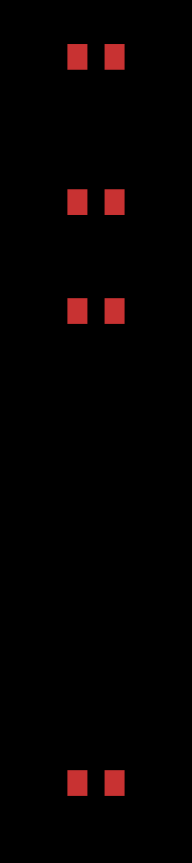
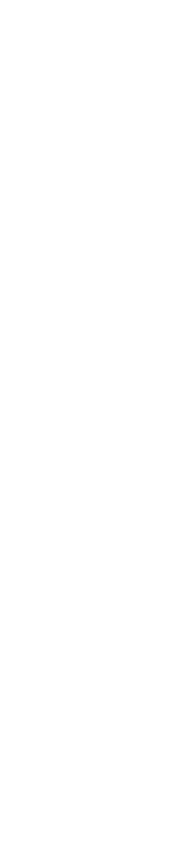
part: (95, 56) -> none
part: (95, 202) -> none
part: (95, 311) -> none
part: (95, 783) -> none

